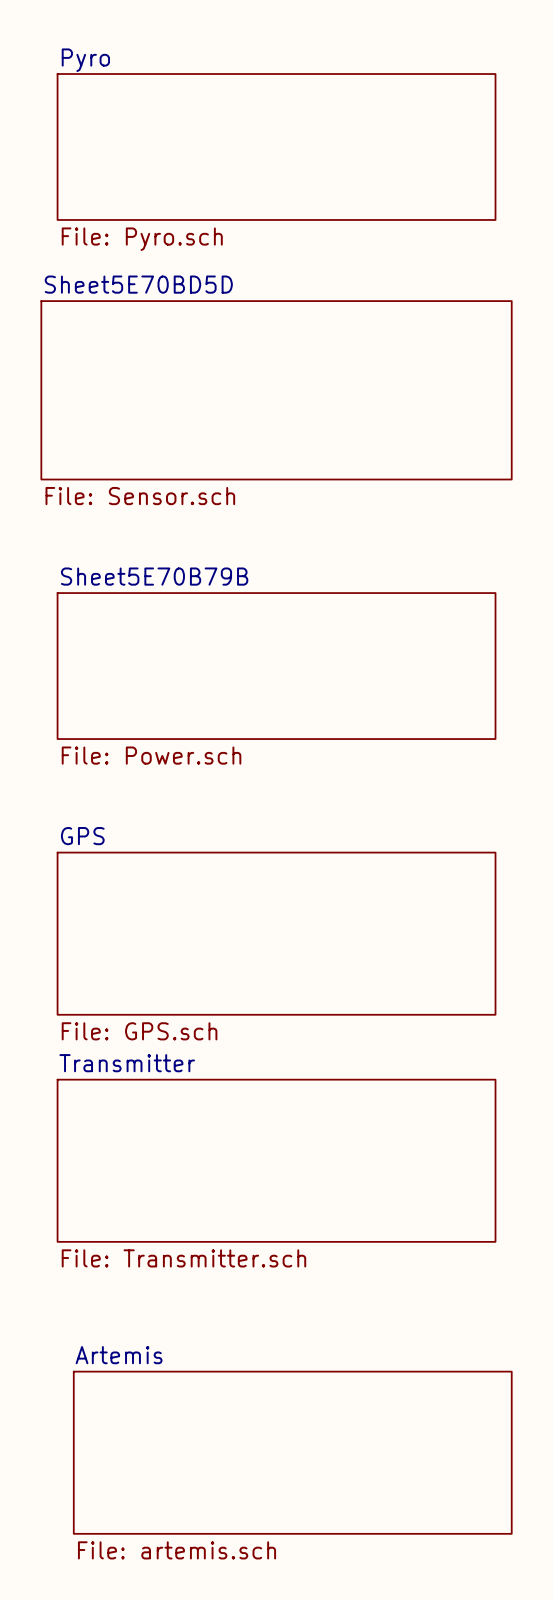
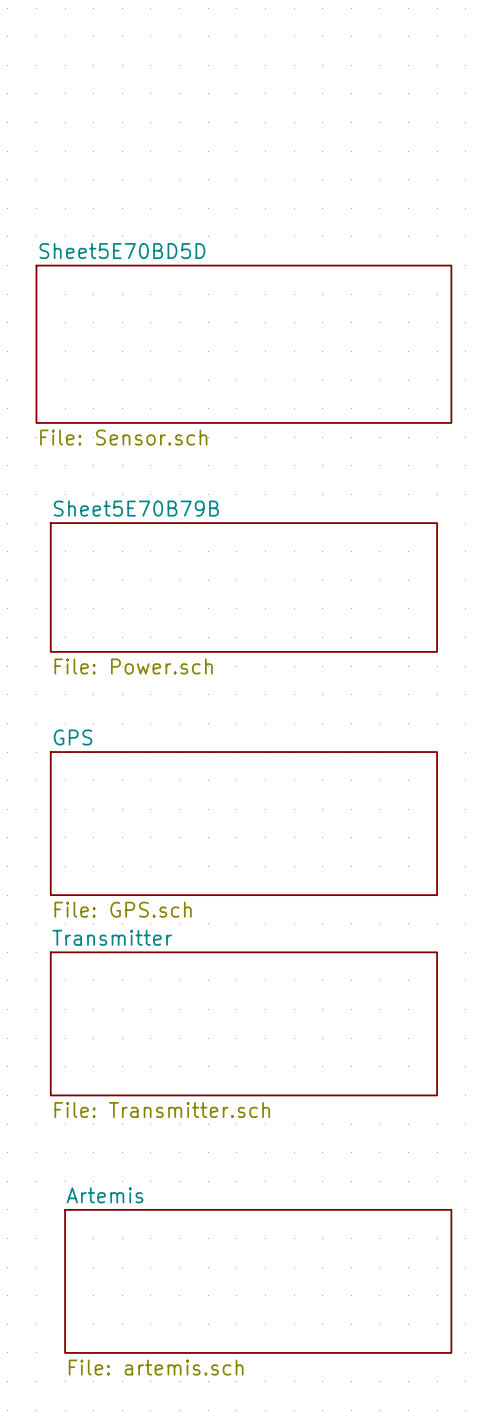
sheet Pyro: File: Pyro.sch (276, 146) -> none

